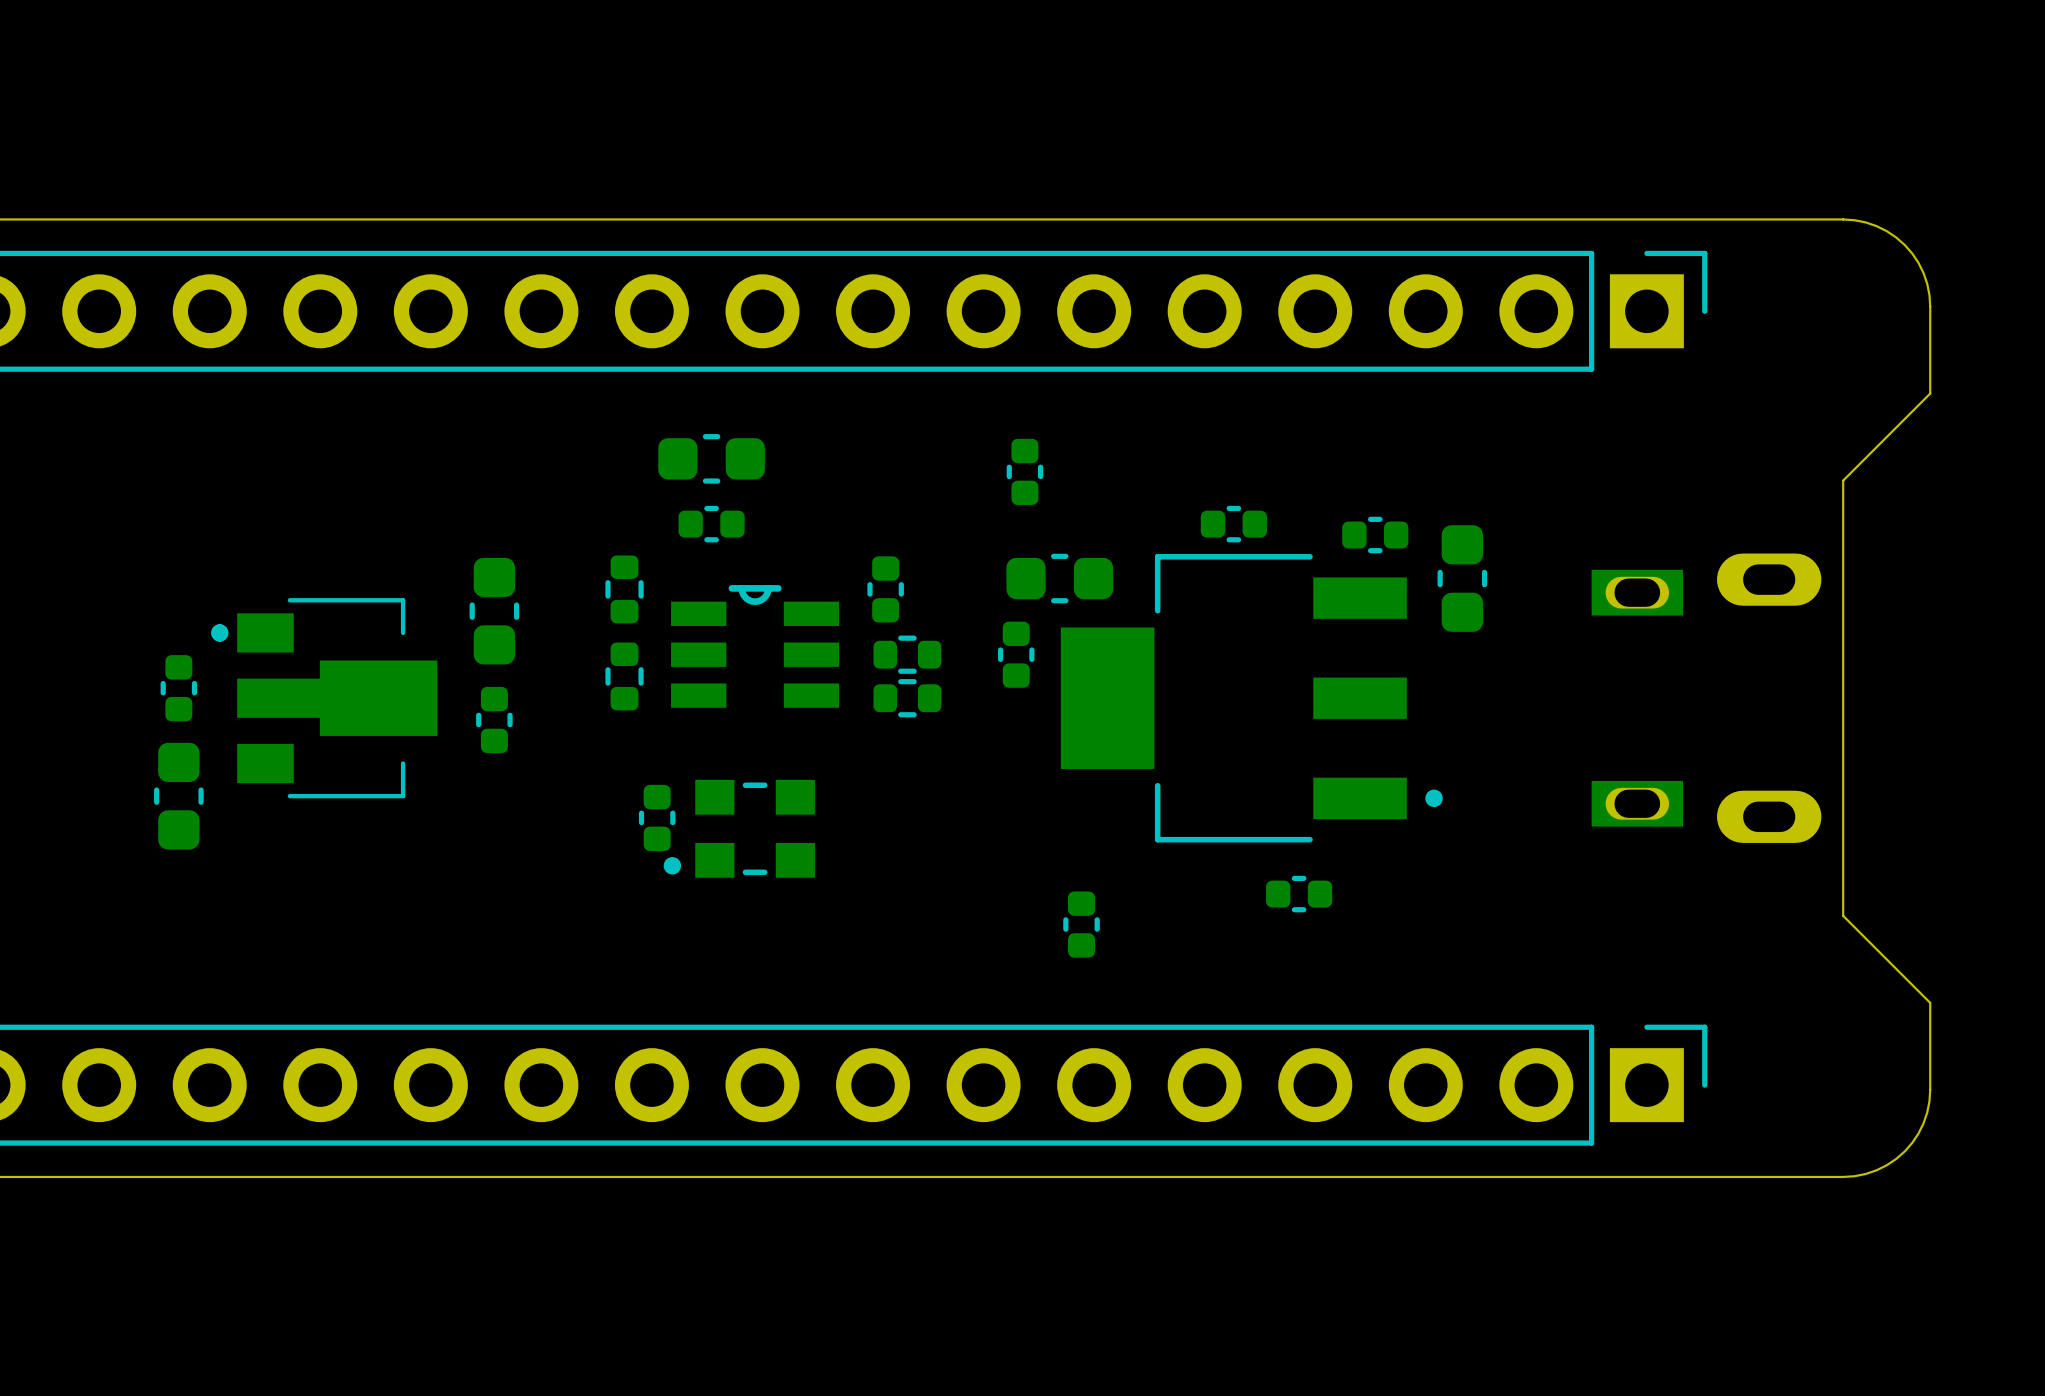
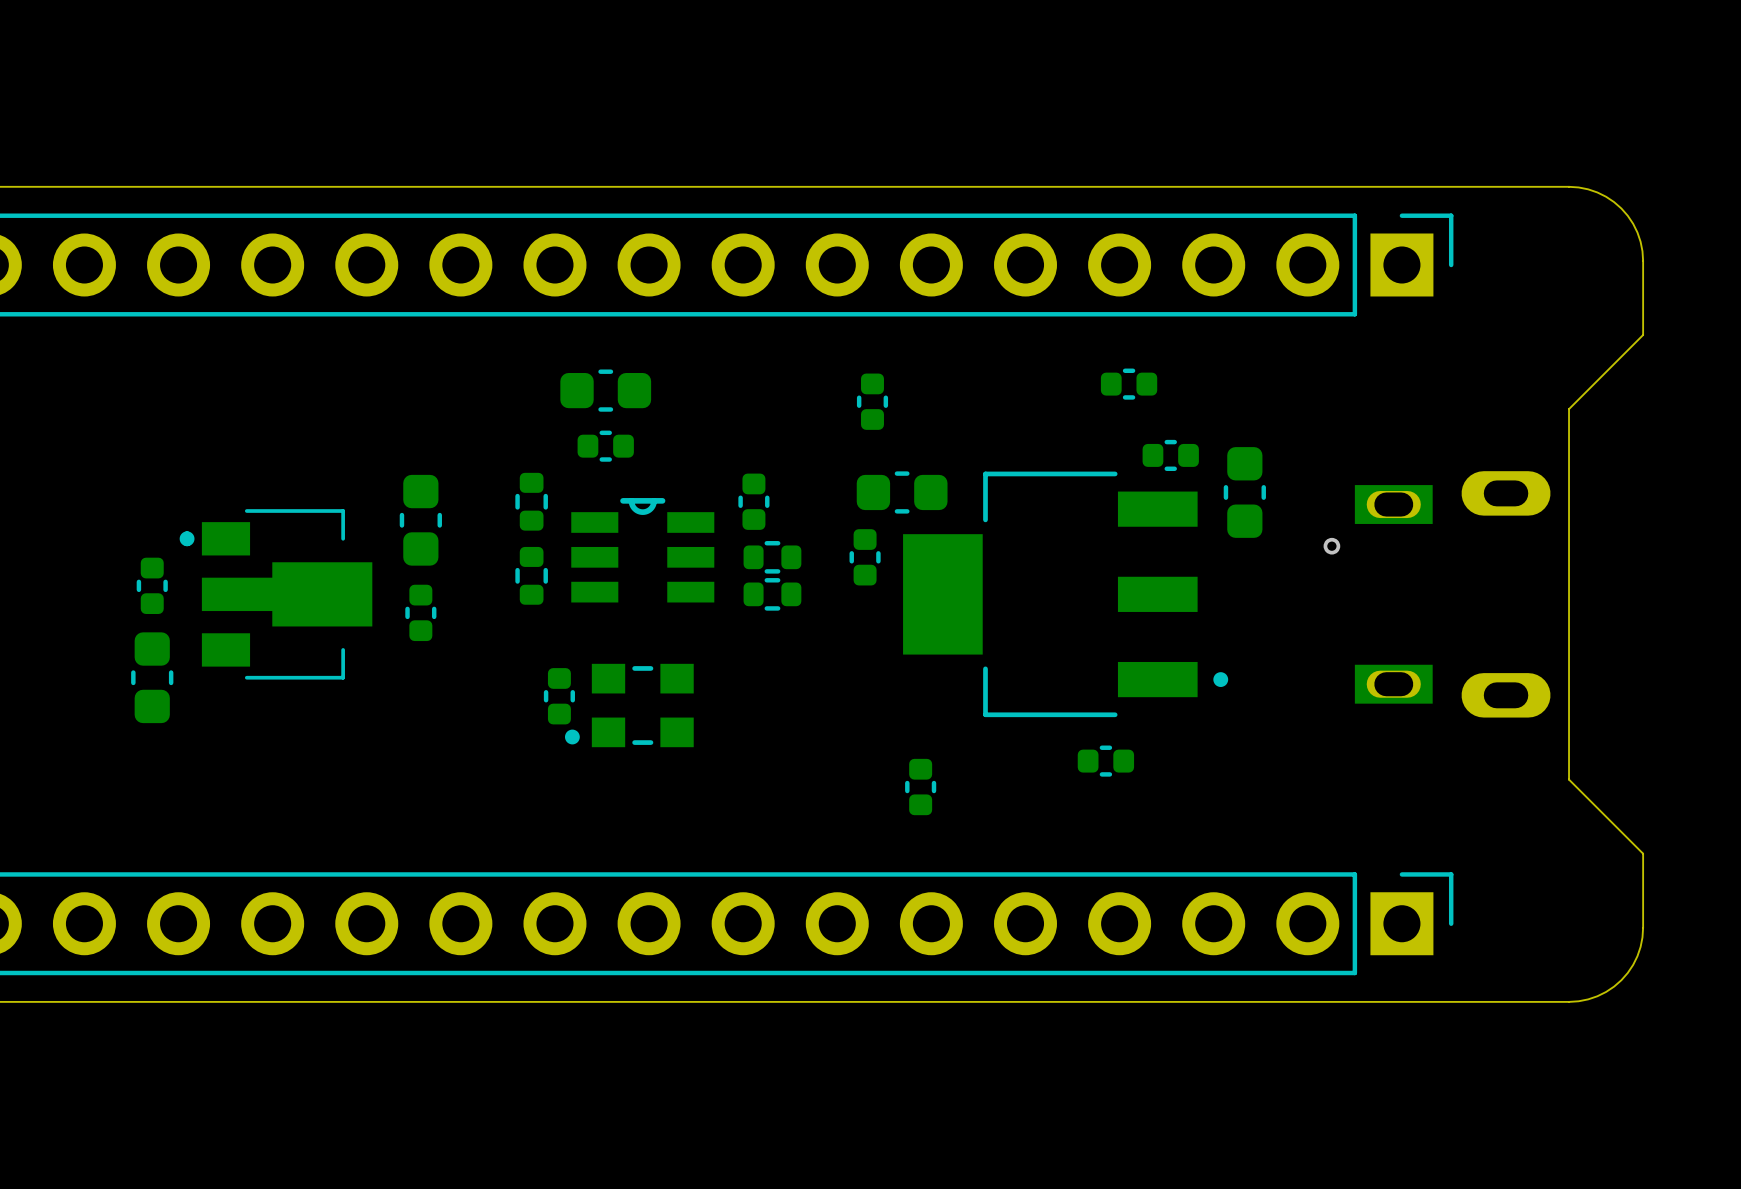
part position: (1233, 524) -> (1129, 384)
via: none -> (1331, 546)

